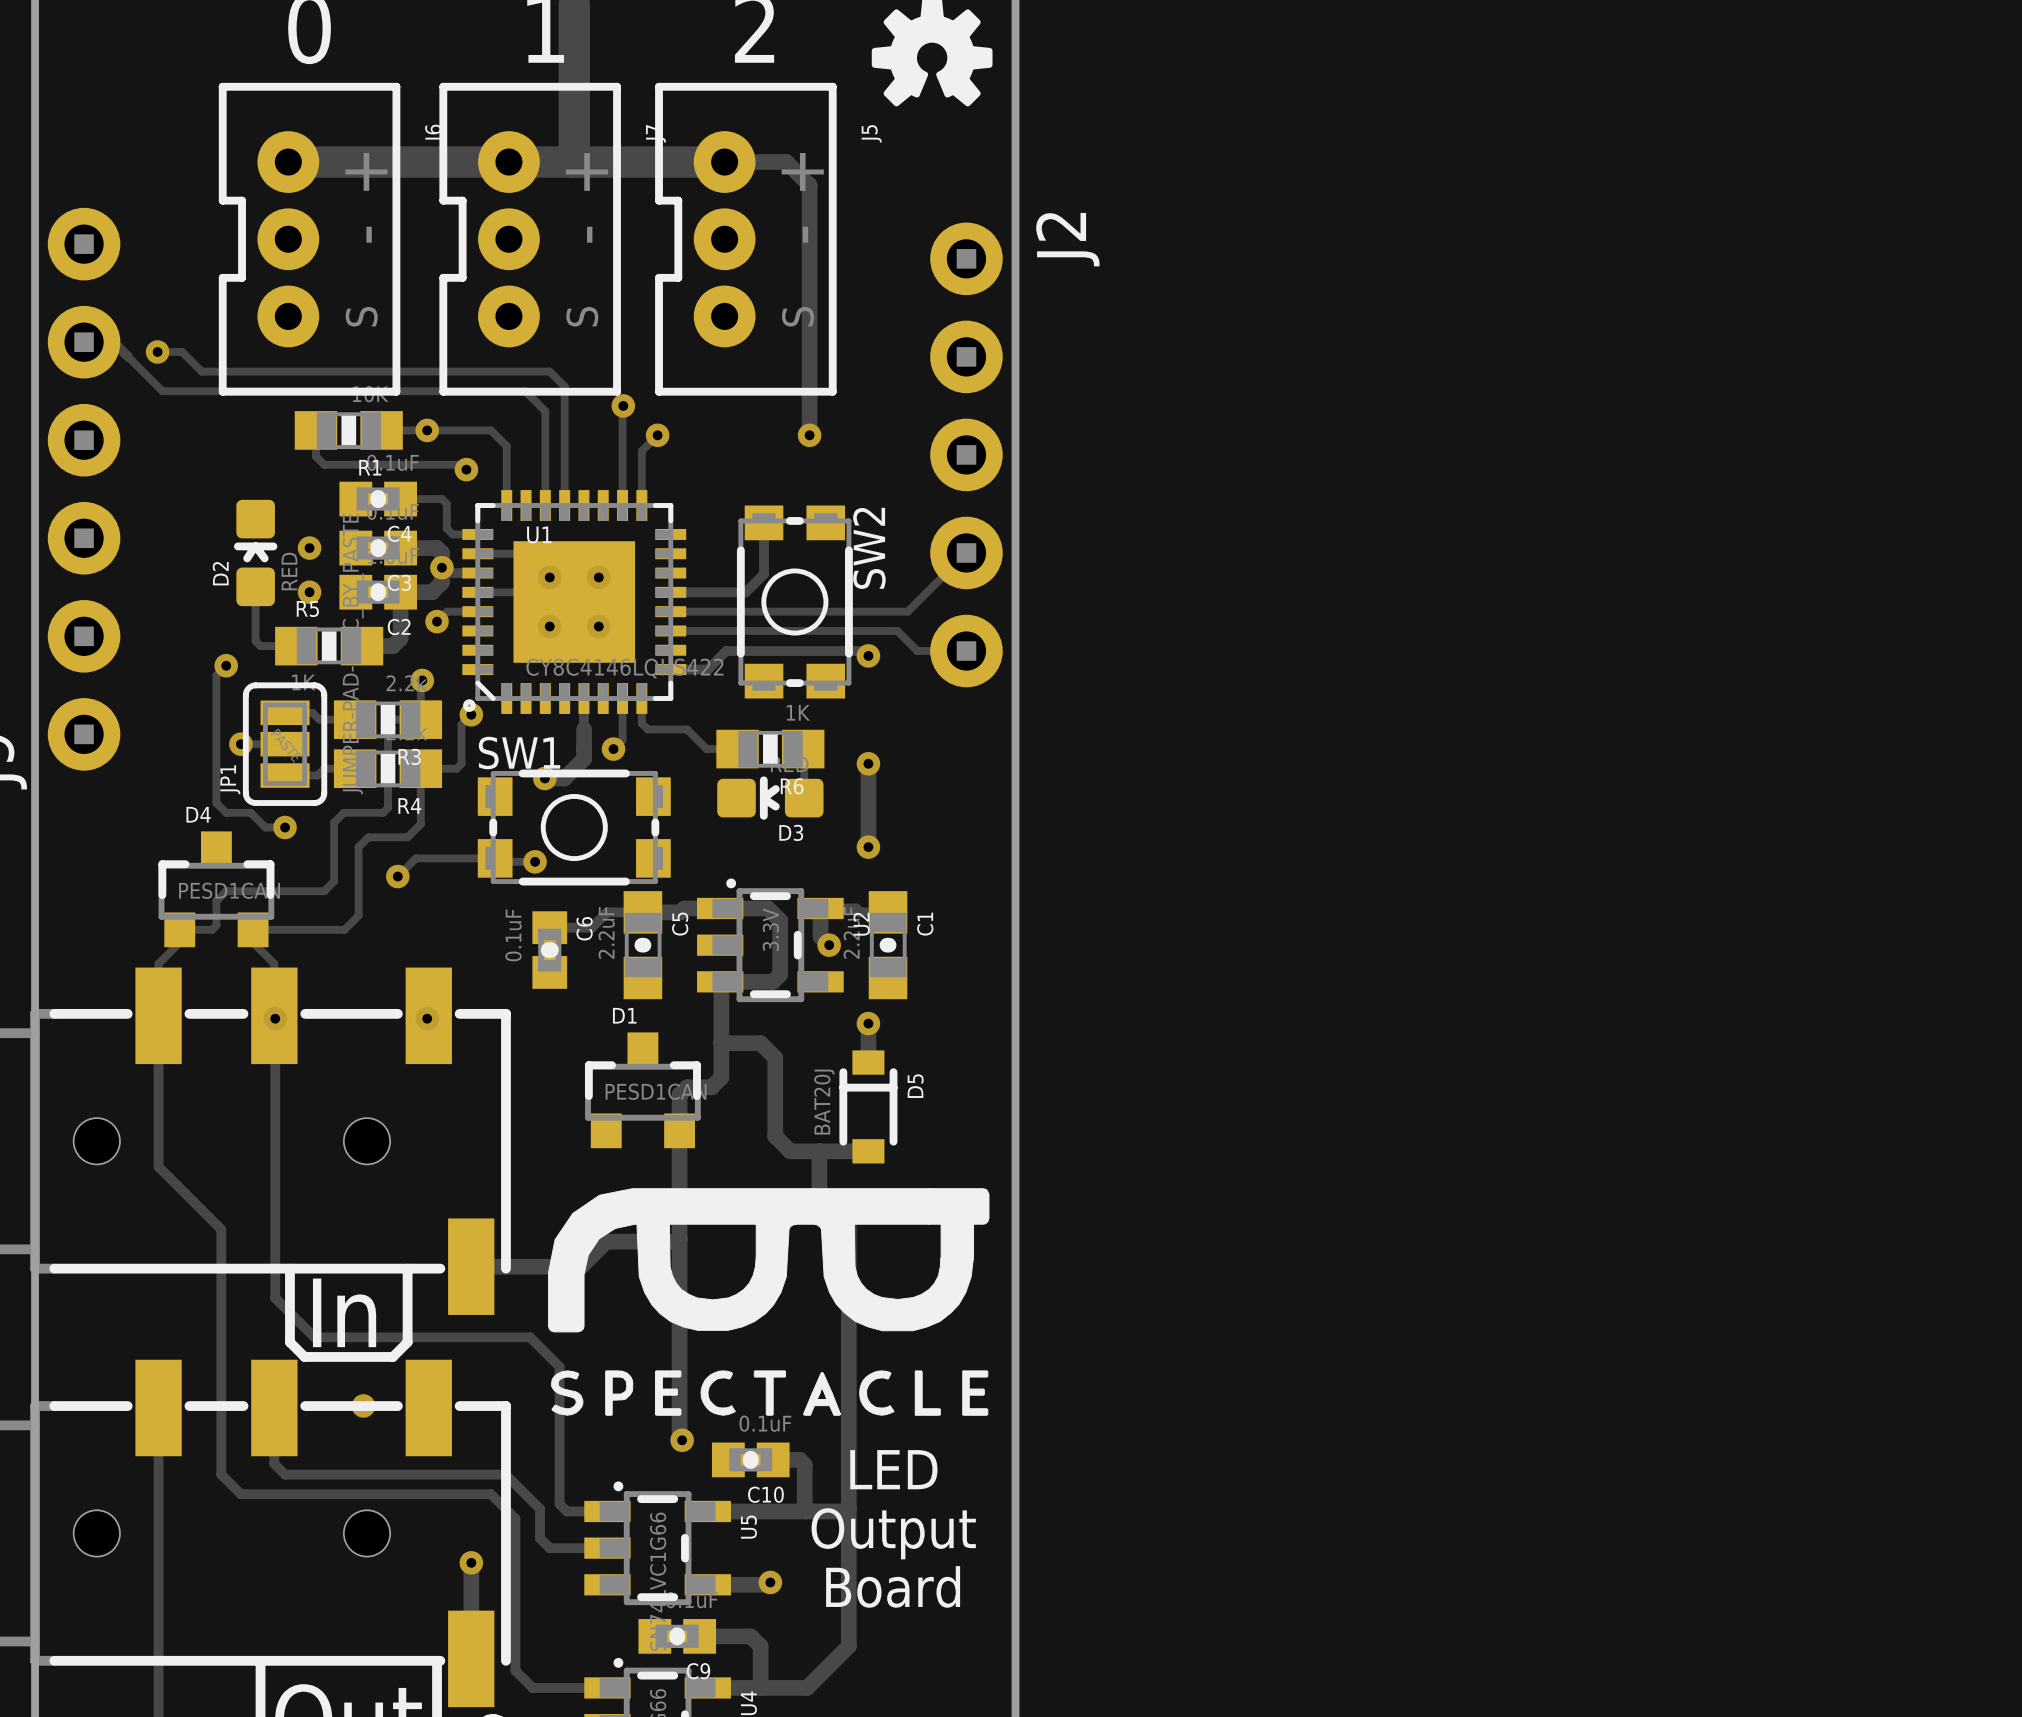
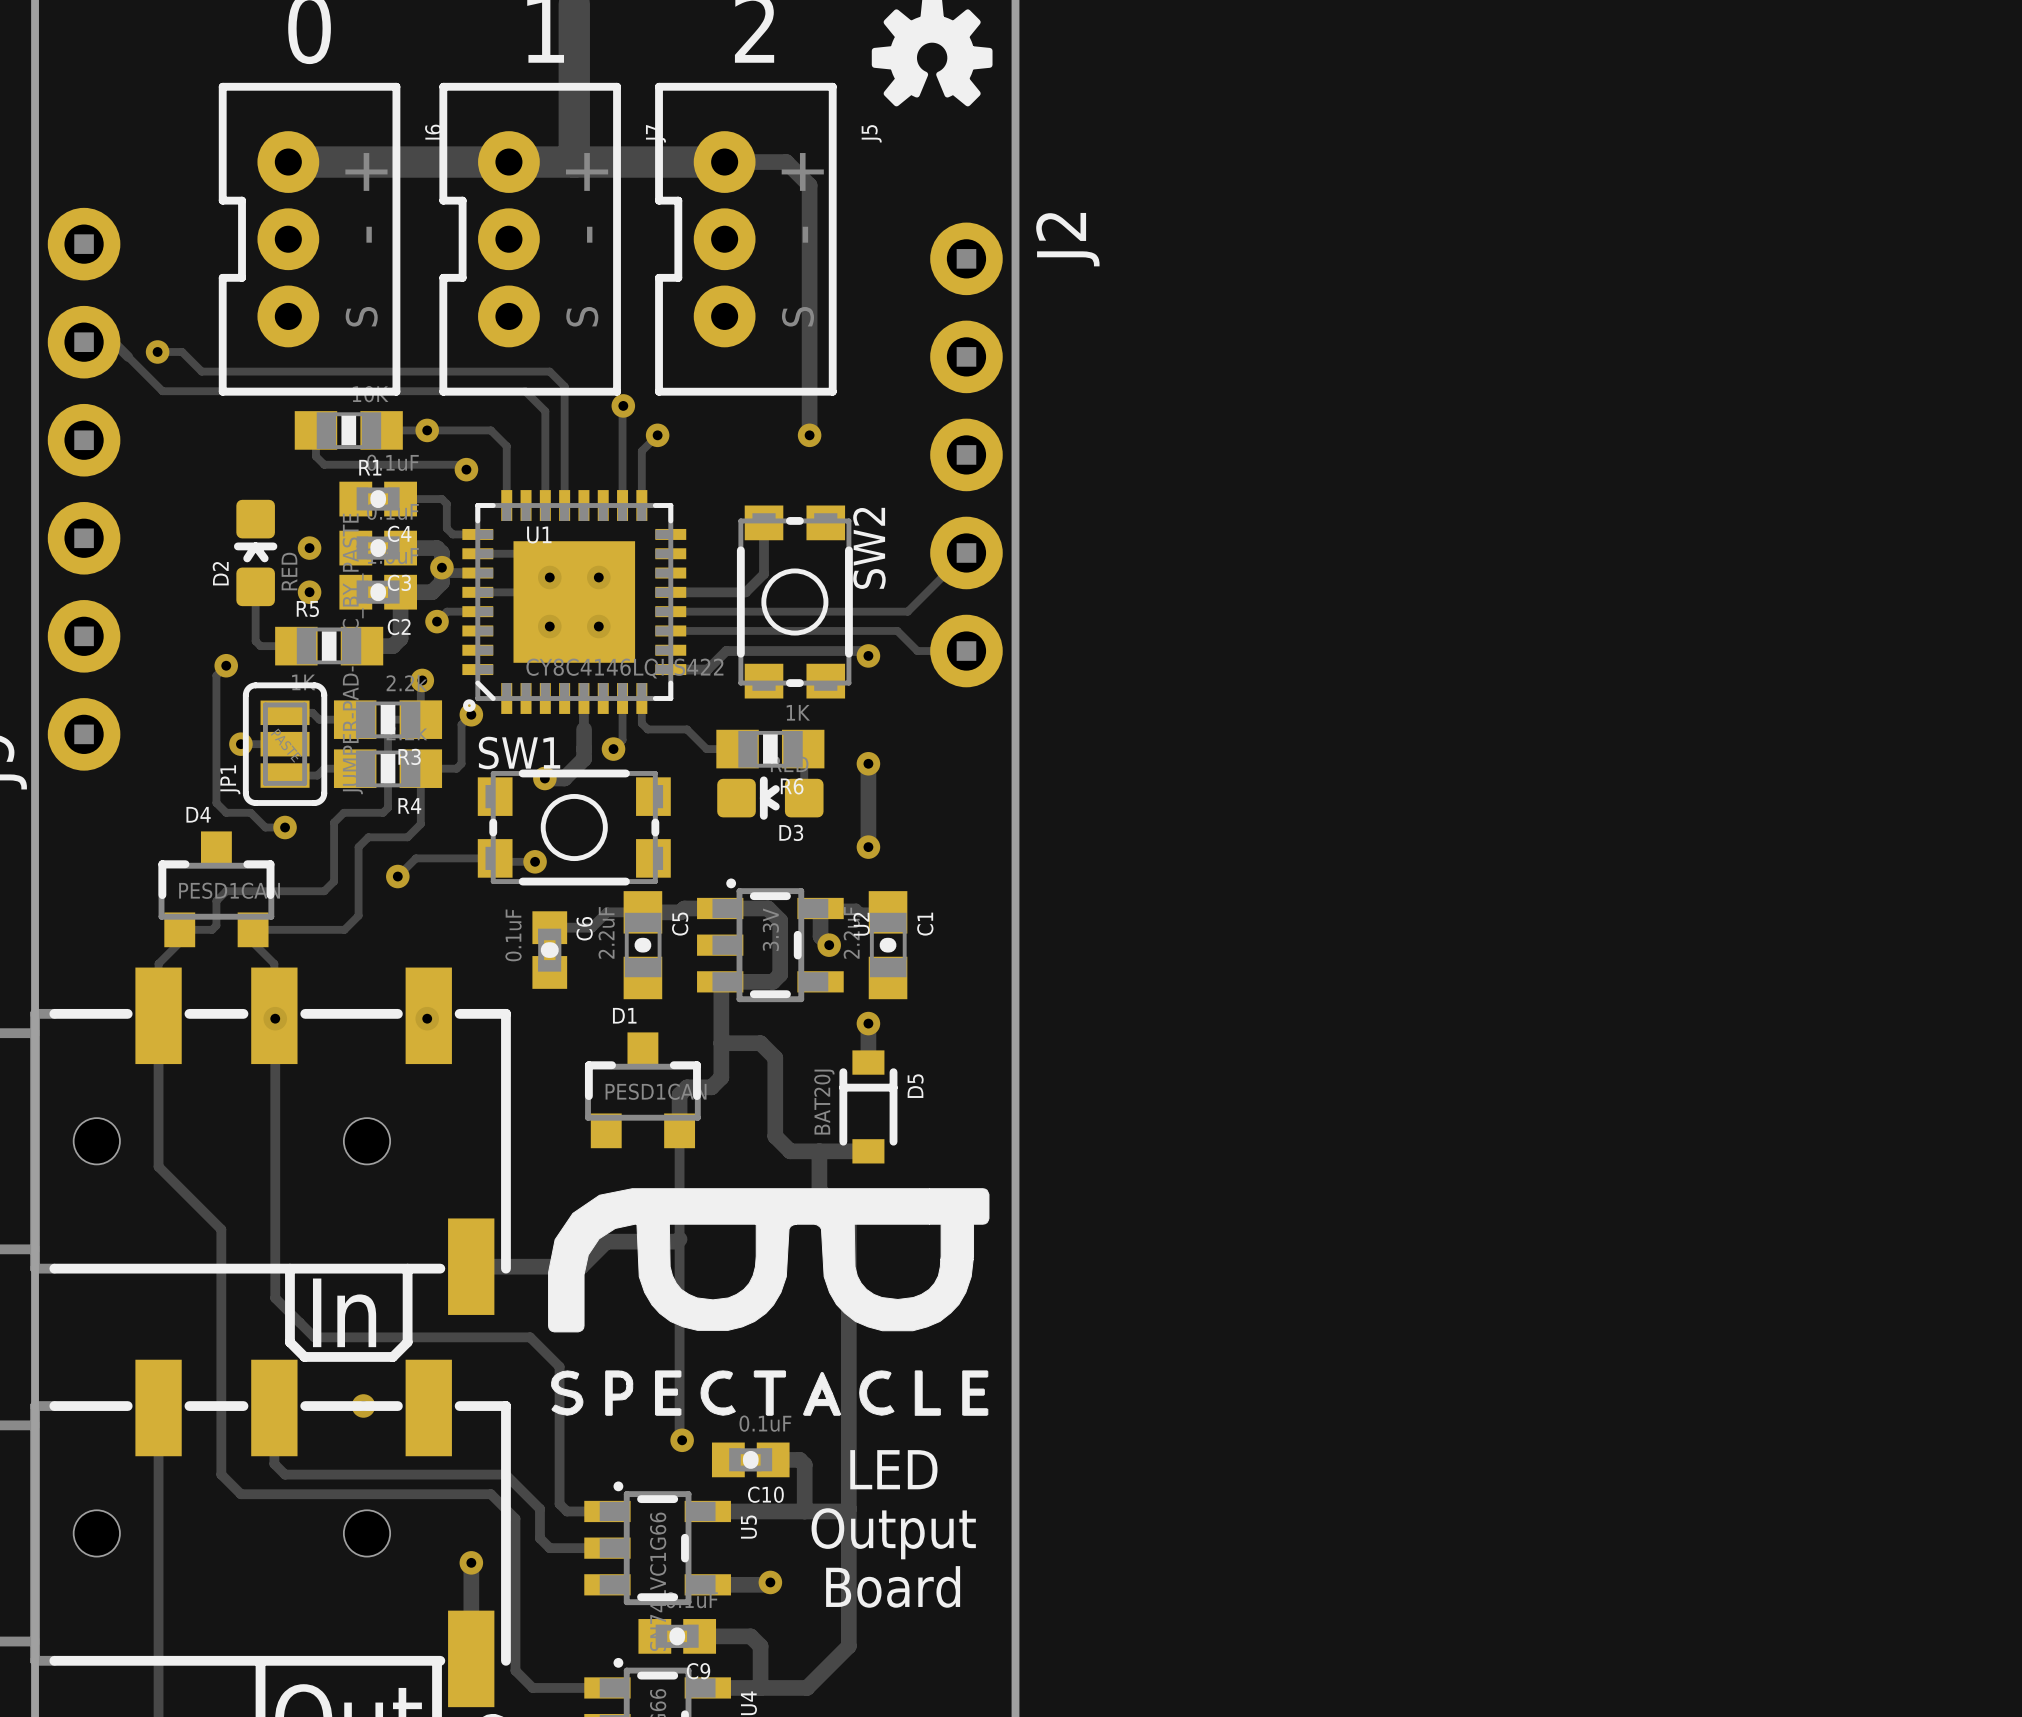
track width: thick (679, 1130) (679, 1437) -> thin (679, 1130) (679, 1437)

